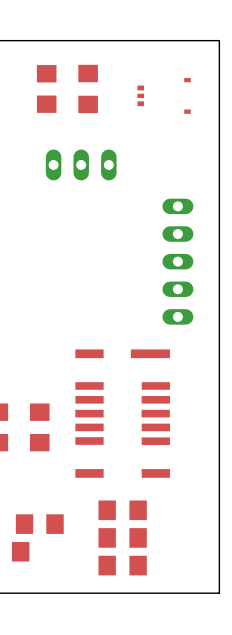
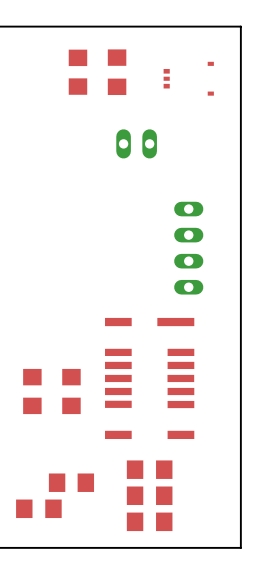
part: (81, 164) -> none
part: none -> (136, 143)
part: (177, 261) -> none
part: none -> (188, 248)

